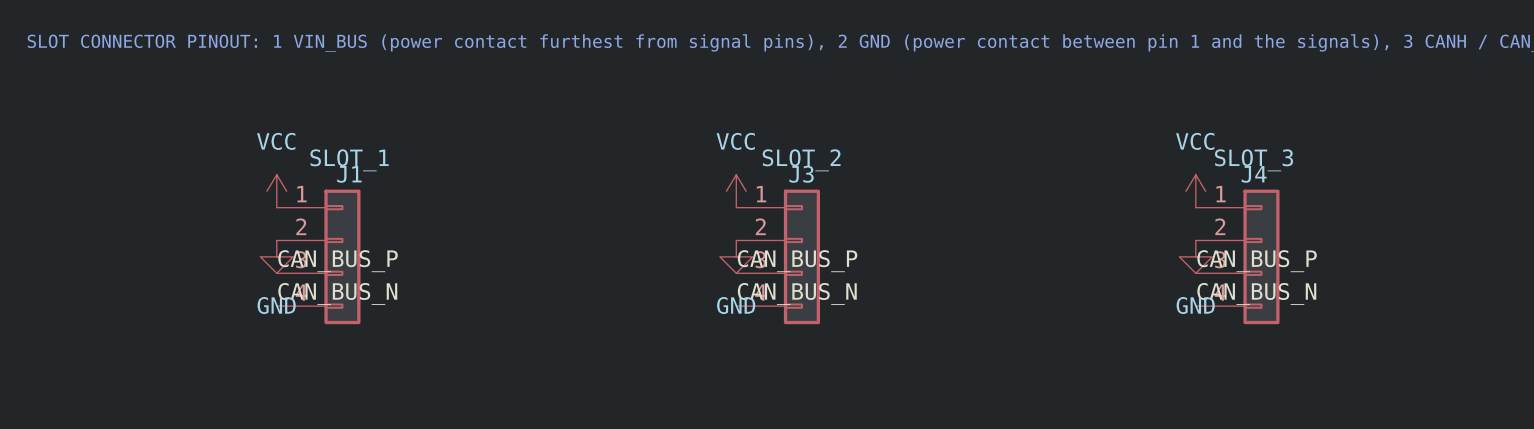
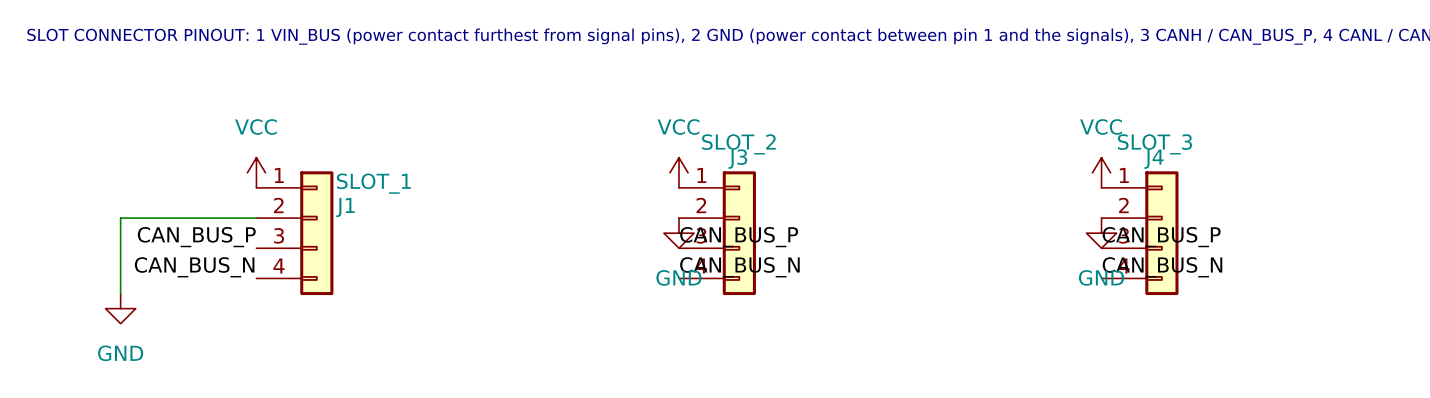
J1 value position: SLOT_1 (349, 160) -> SLOT_1 (373, 183)
J1 name position: J1 (349, 174) -> J1 (345, 207)
wire: none -> (256, 218) (120, 218) (120, 293)
power symbol position: GND (276, 256) -> GND (120, 308)
label position: CAN_BUS_P (338, 261) -> CAN_BUS_P (196, 237)
label position: CAN_BUS_N (337, 293) -> CAN_BUS_N (194, 267)

